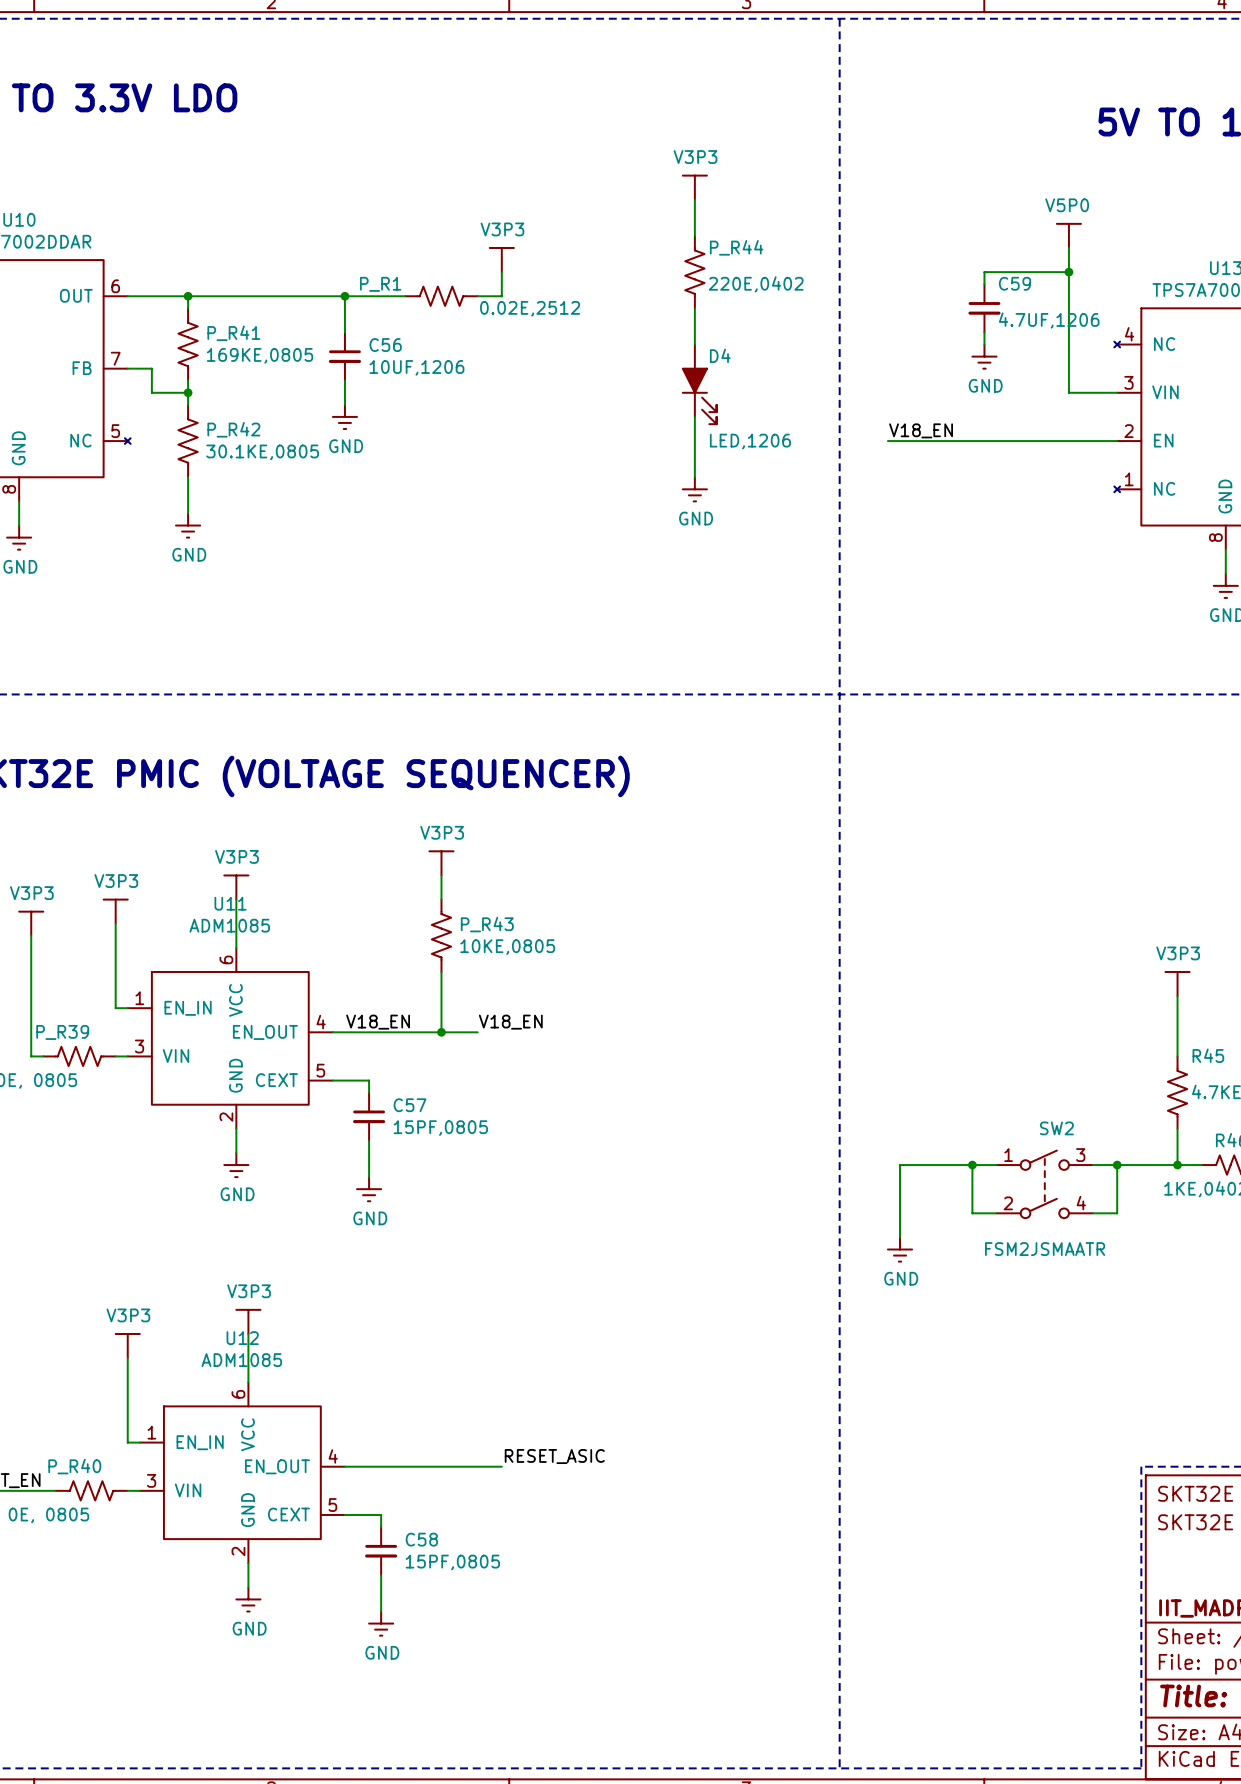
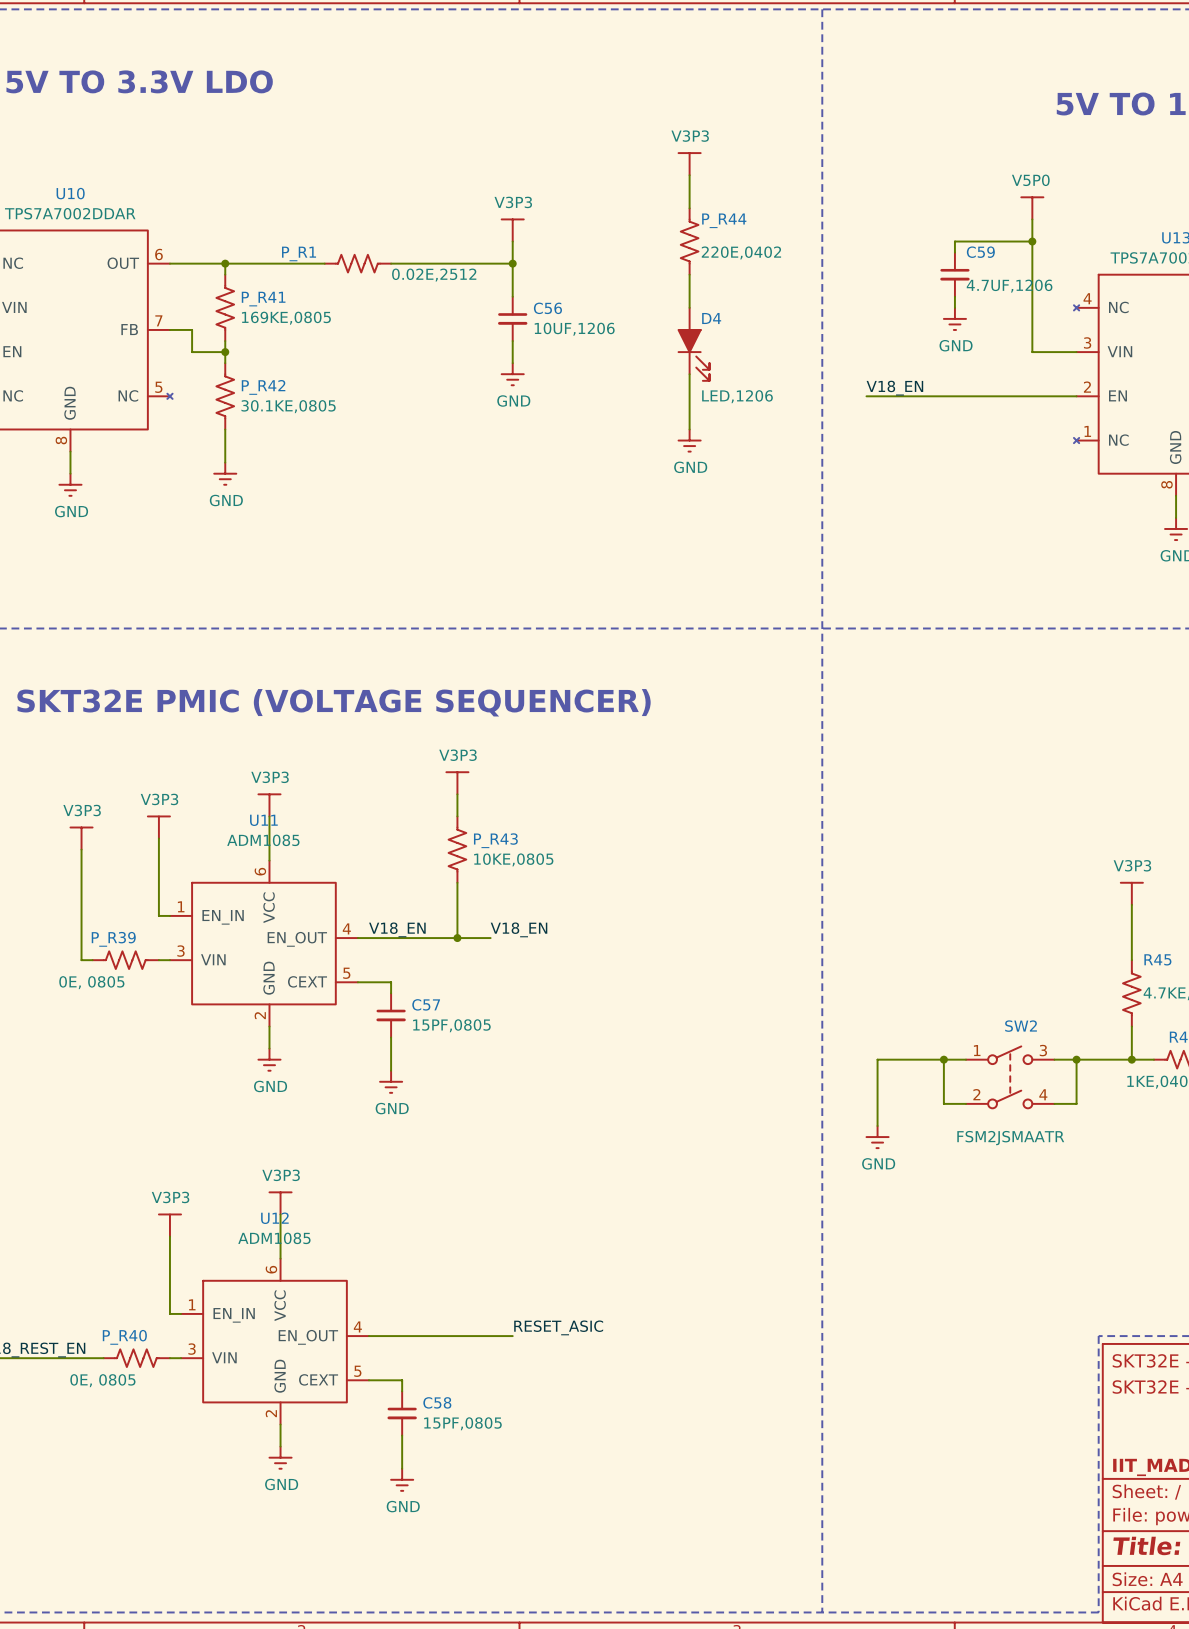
wire: (344, 296) (344, 332) -> (512, 263) (512, 296)
junction: (344, 296) -> none
P_R1 position: (441, 296) -> (357, 263)
junction: none -> (512, 263)
C56 position: (344, 356) -> (512, 318)
wire: (344, 380) (344, 404) -> (512, 341) (512, 363)
power symbol position: GND (344, 416) -> GND (512, 374)

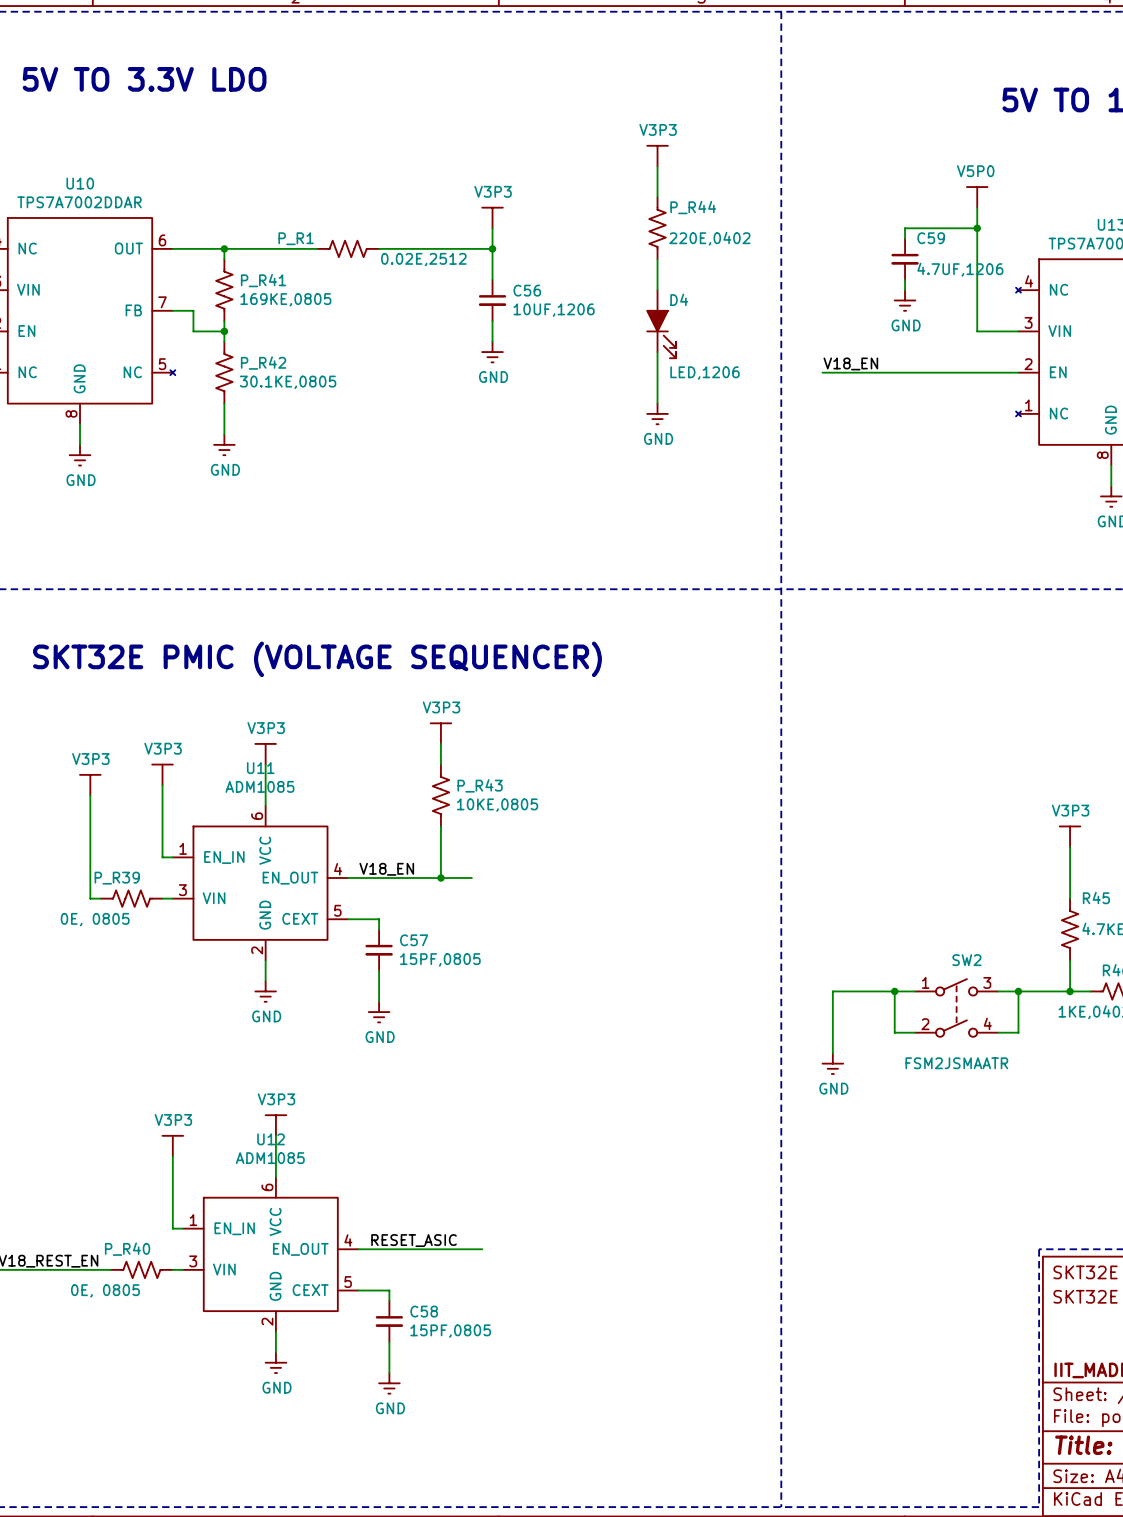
label: V18_EN (519, 929) -> none
label position: RESET_ASIC (558, 1327) -> RESET_ASIC (414, 1240)
wire: (501, 1336) (512, 1336) -> none

